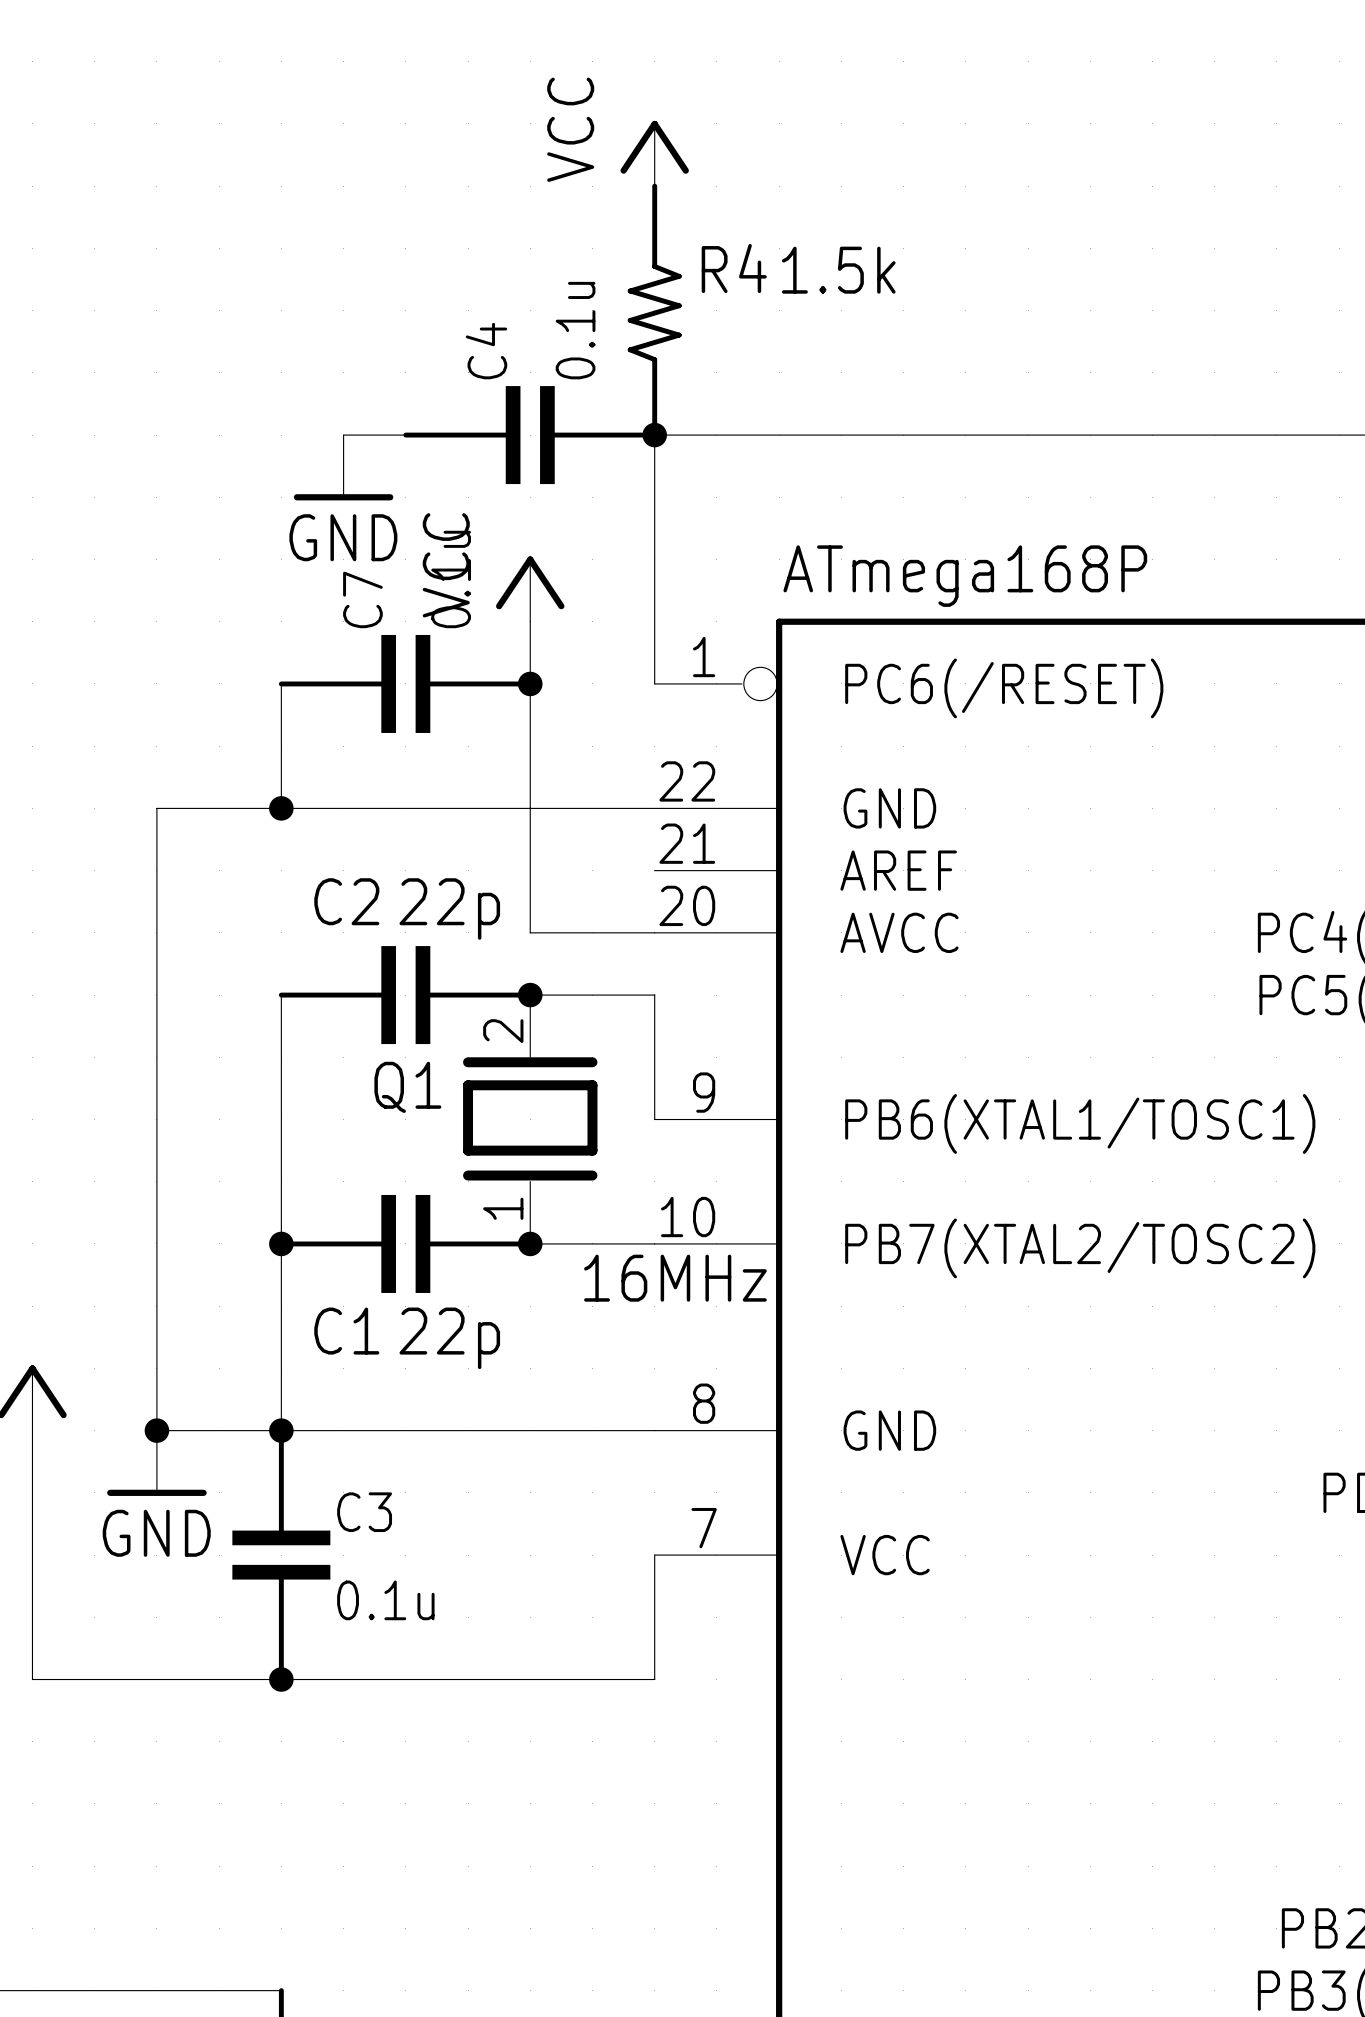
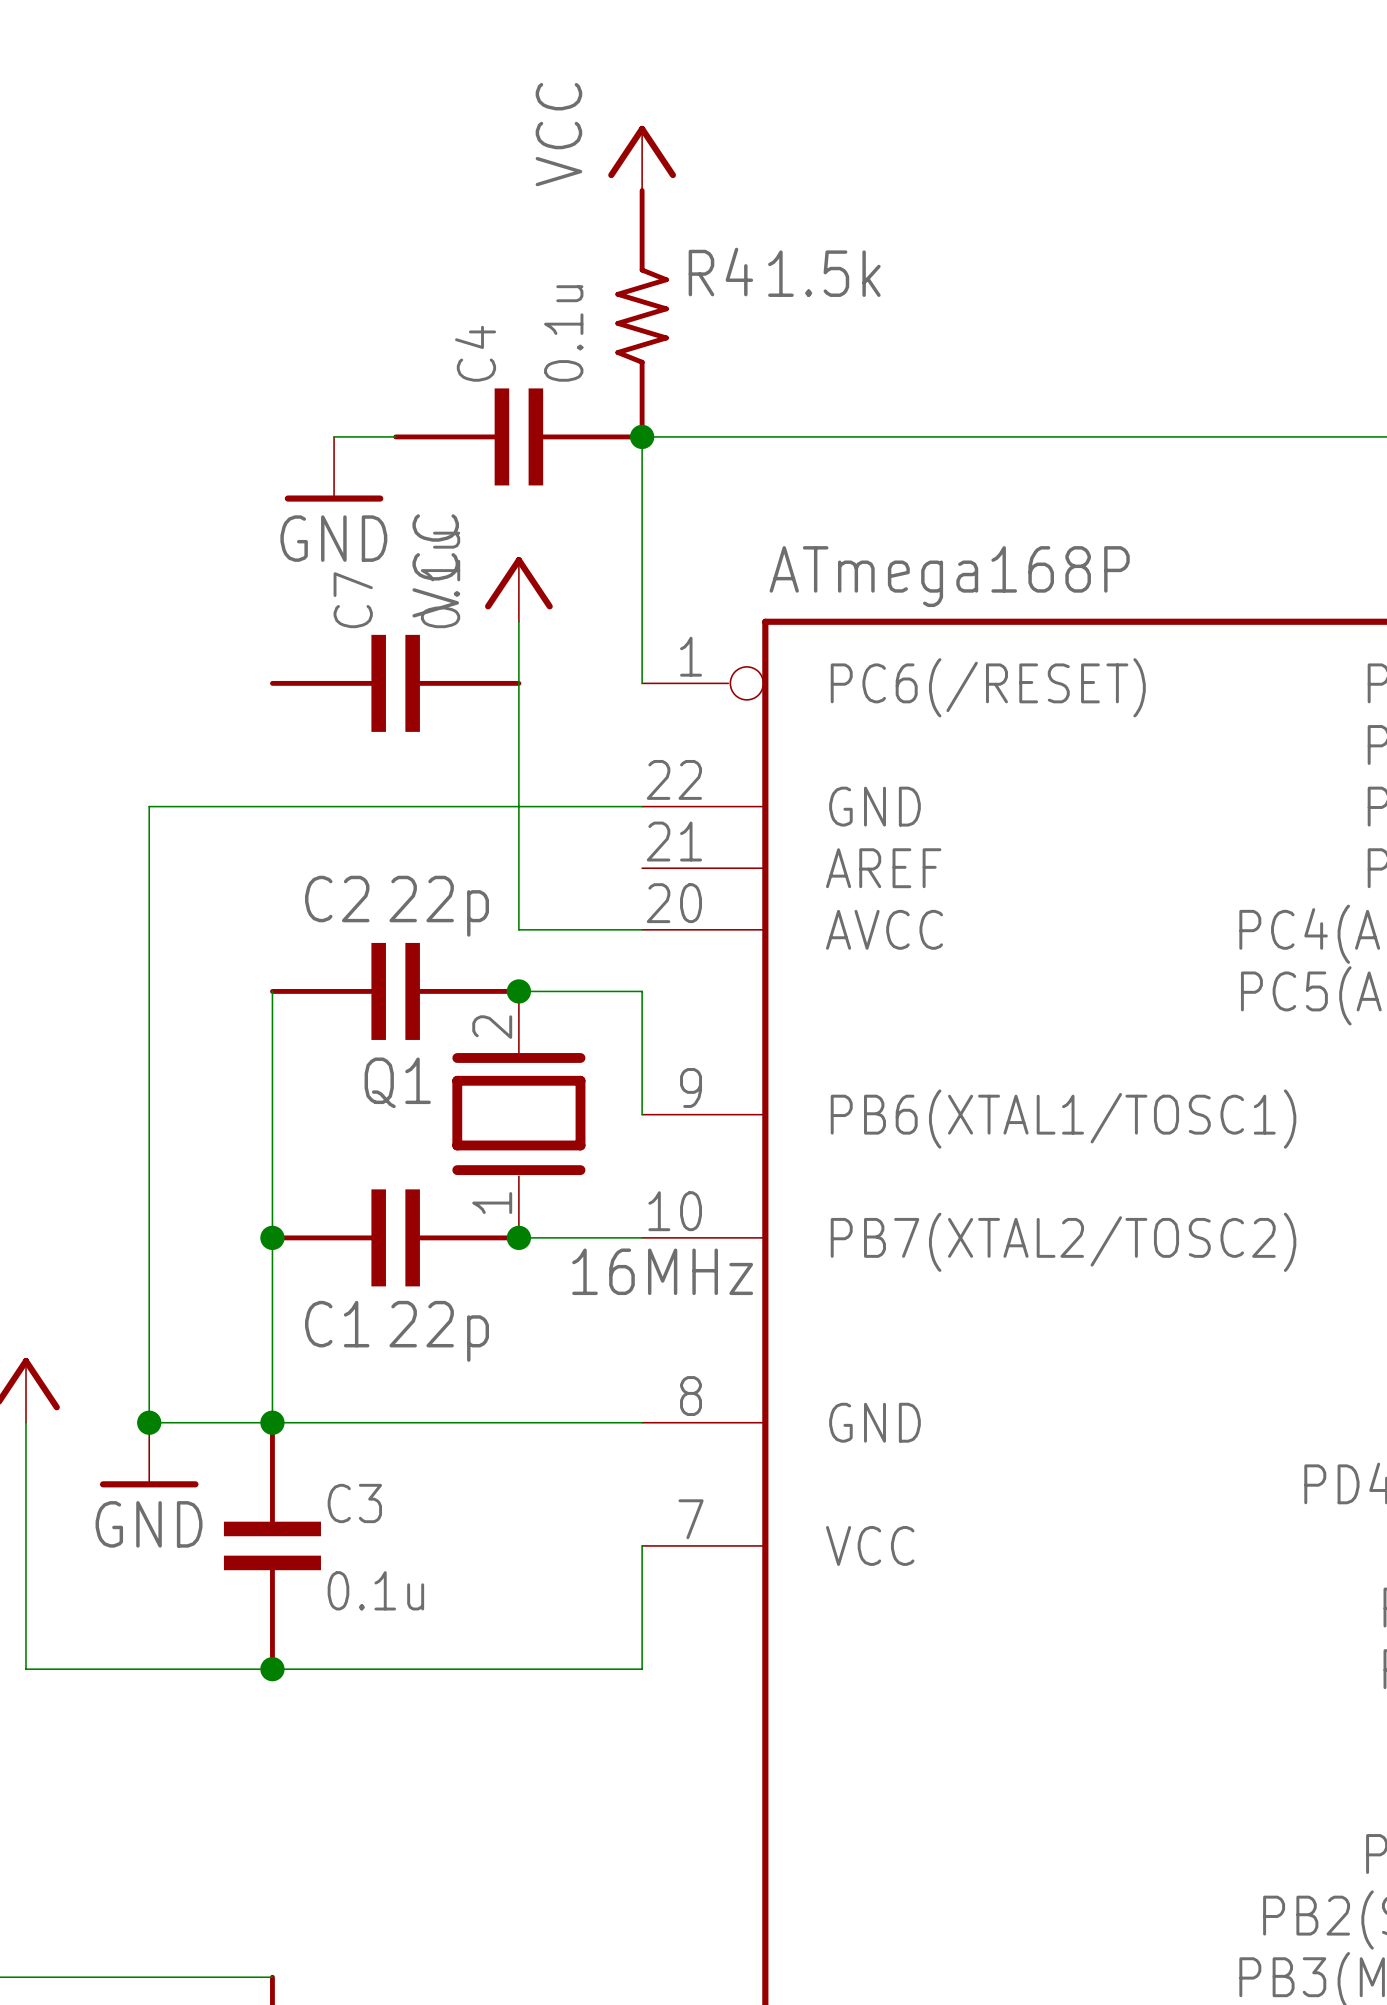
wire: (281, 683) (281, 808) -> none
junction: (530, 683) -> none
junction: (281, 808) -> none

